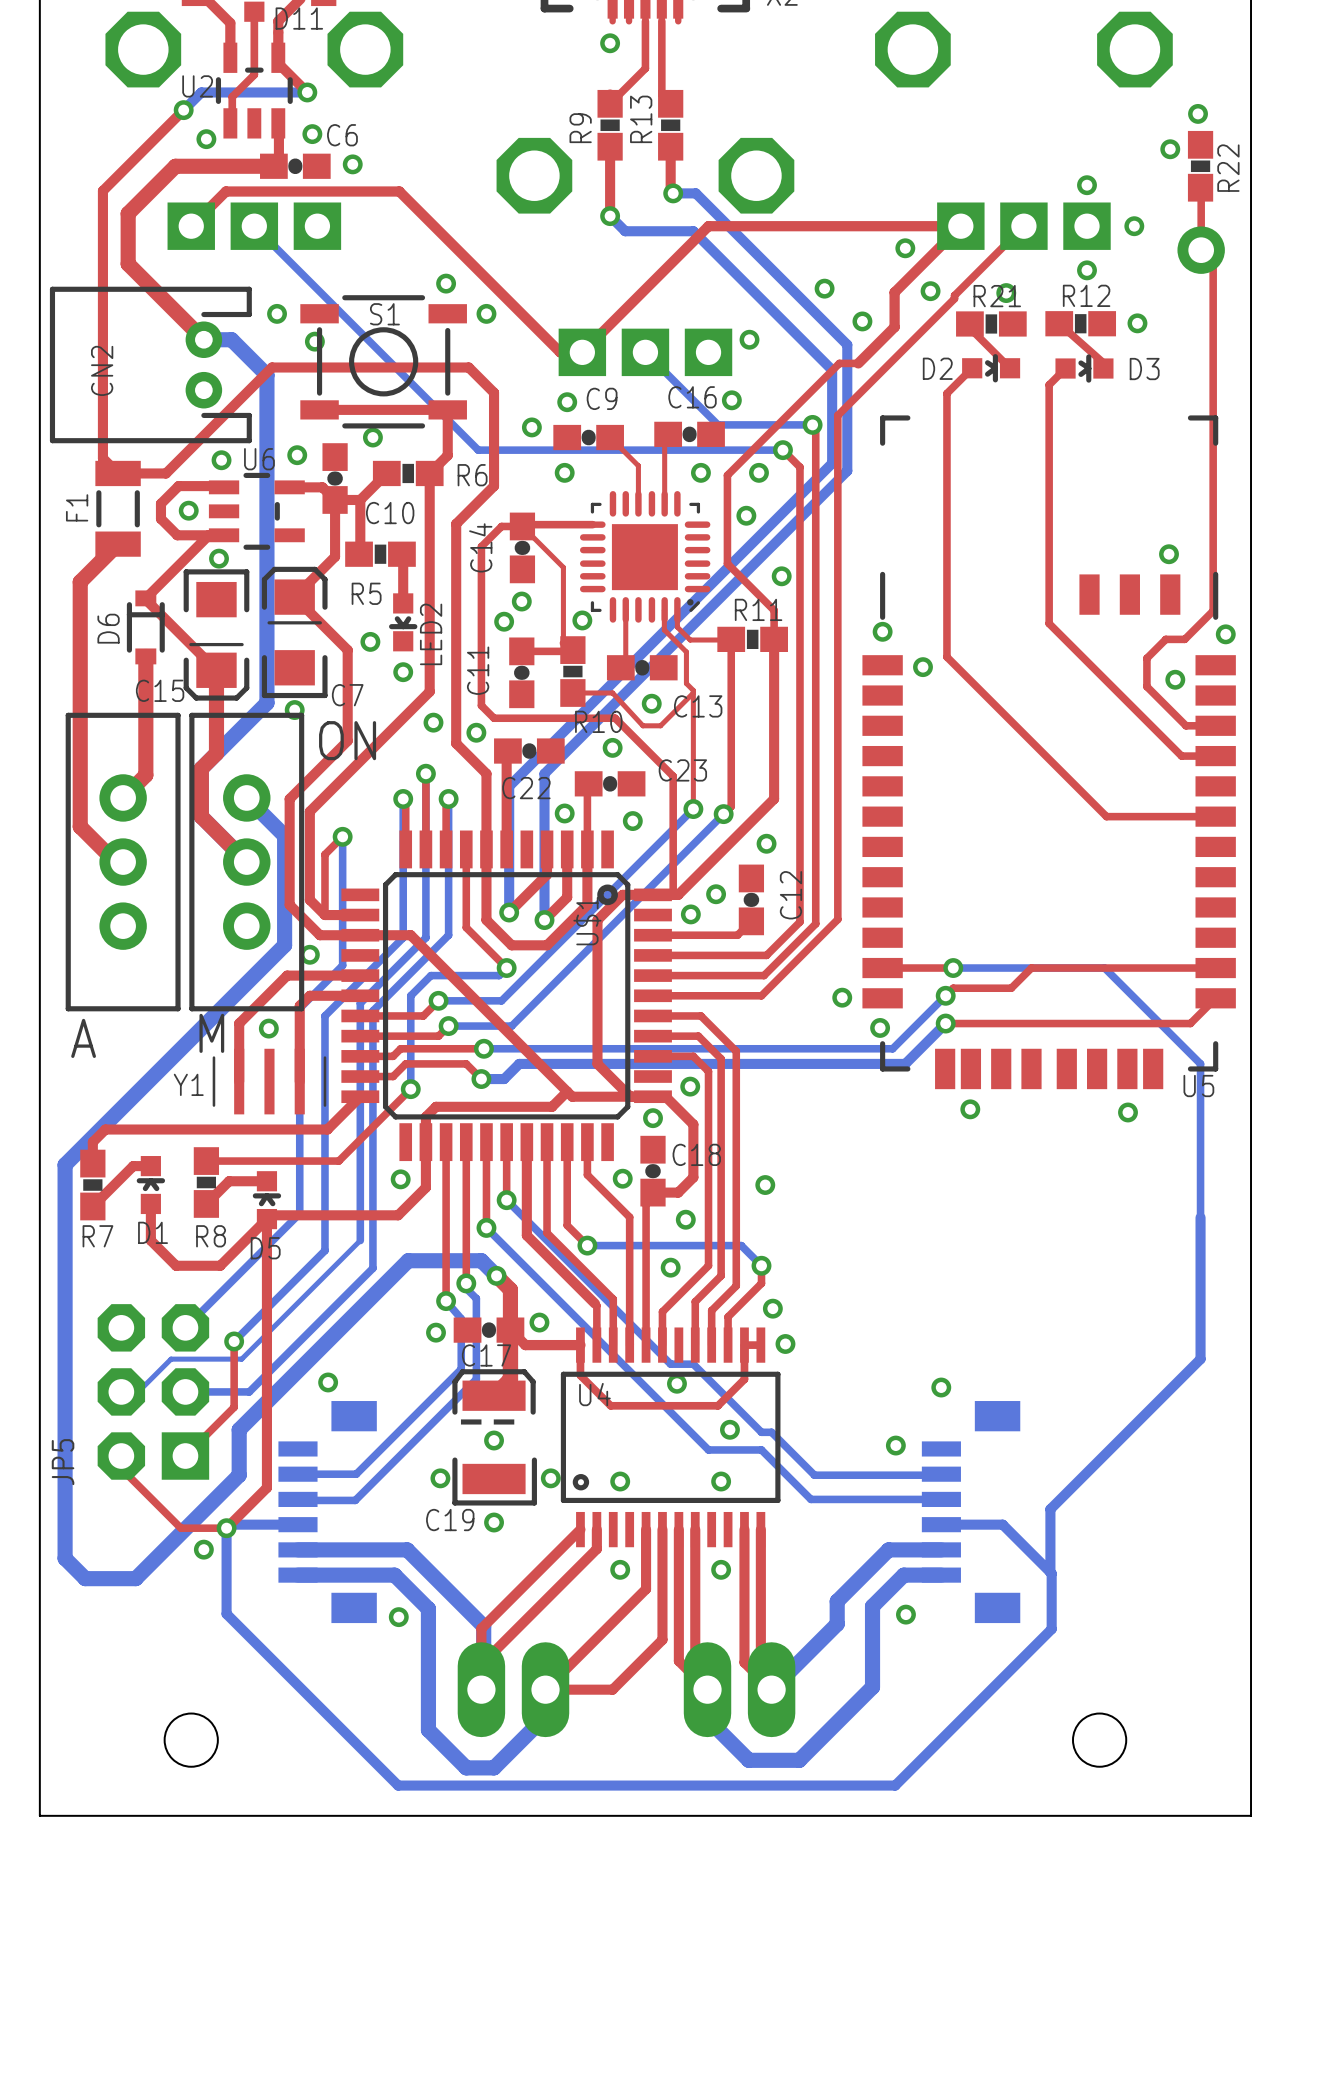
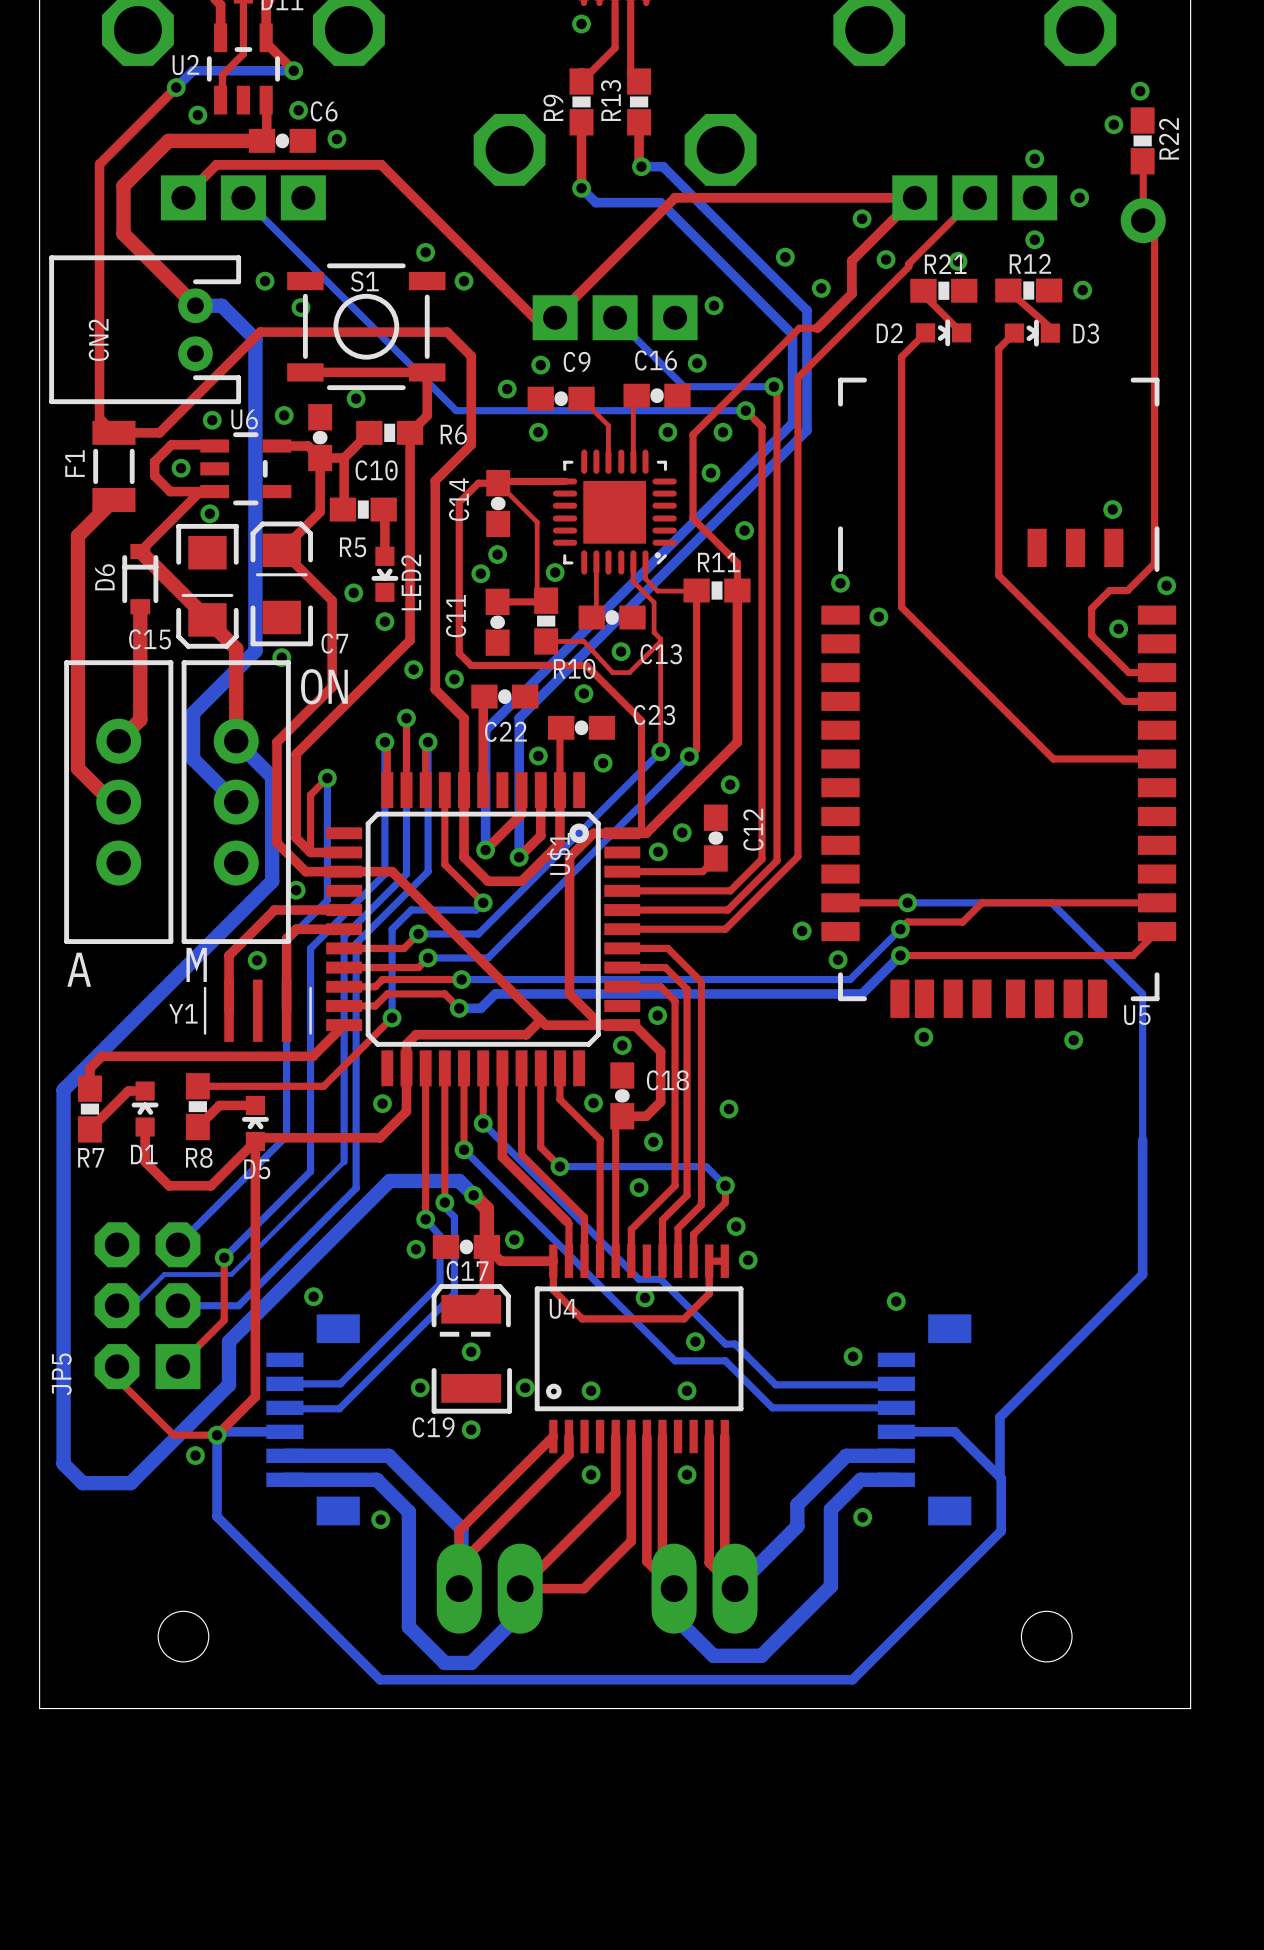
top track: (145, 598) (216, 670) (216, 753) (201, 768) (201, 816) (246, 862) -> (140, 551) (236, 648) (236, 741)

